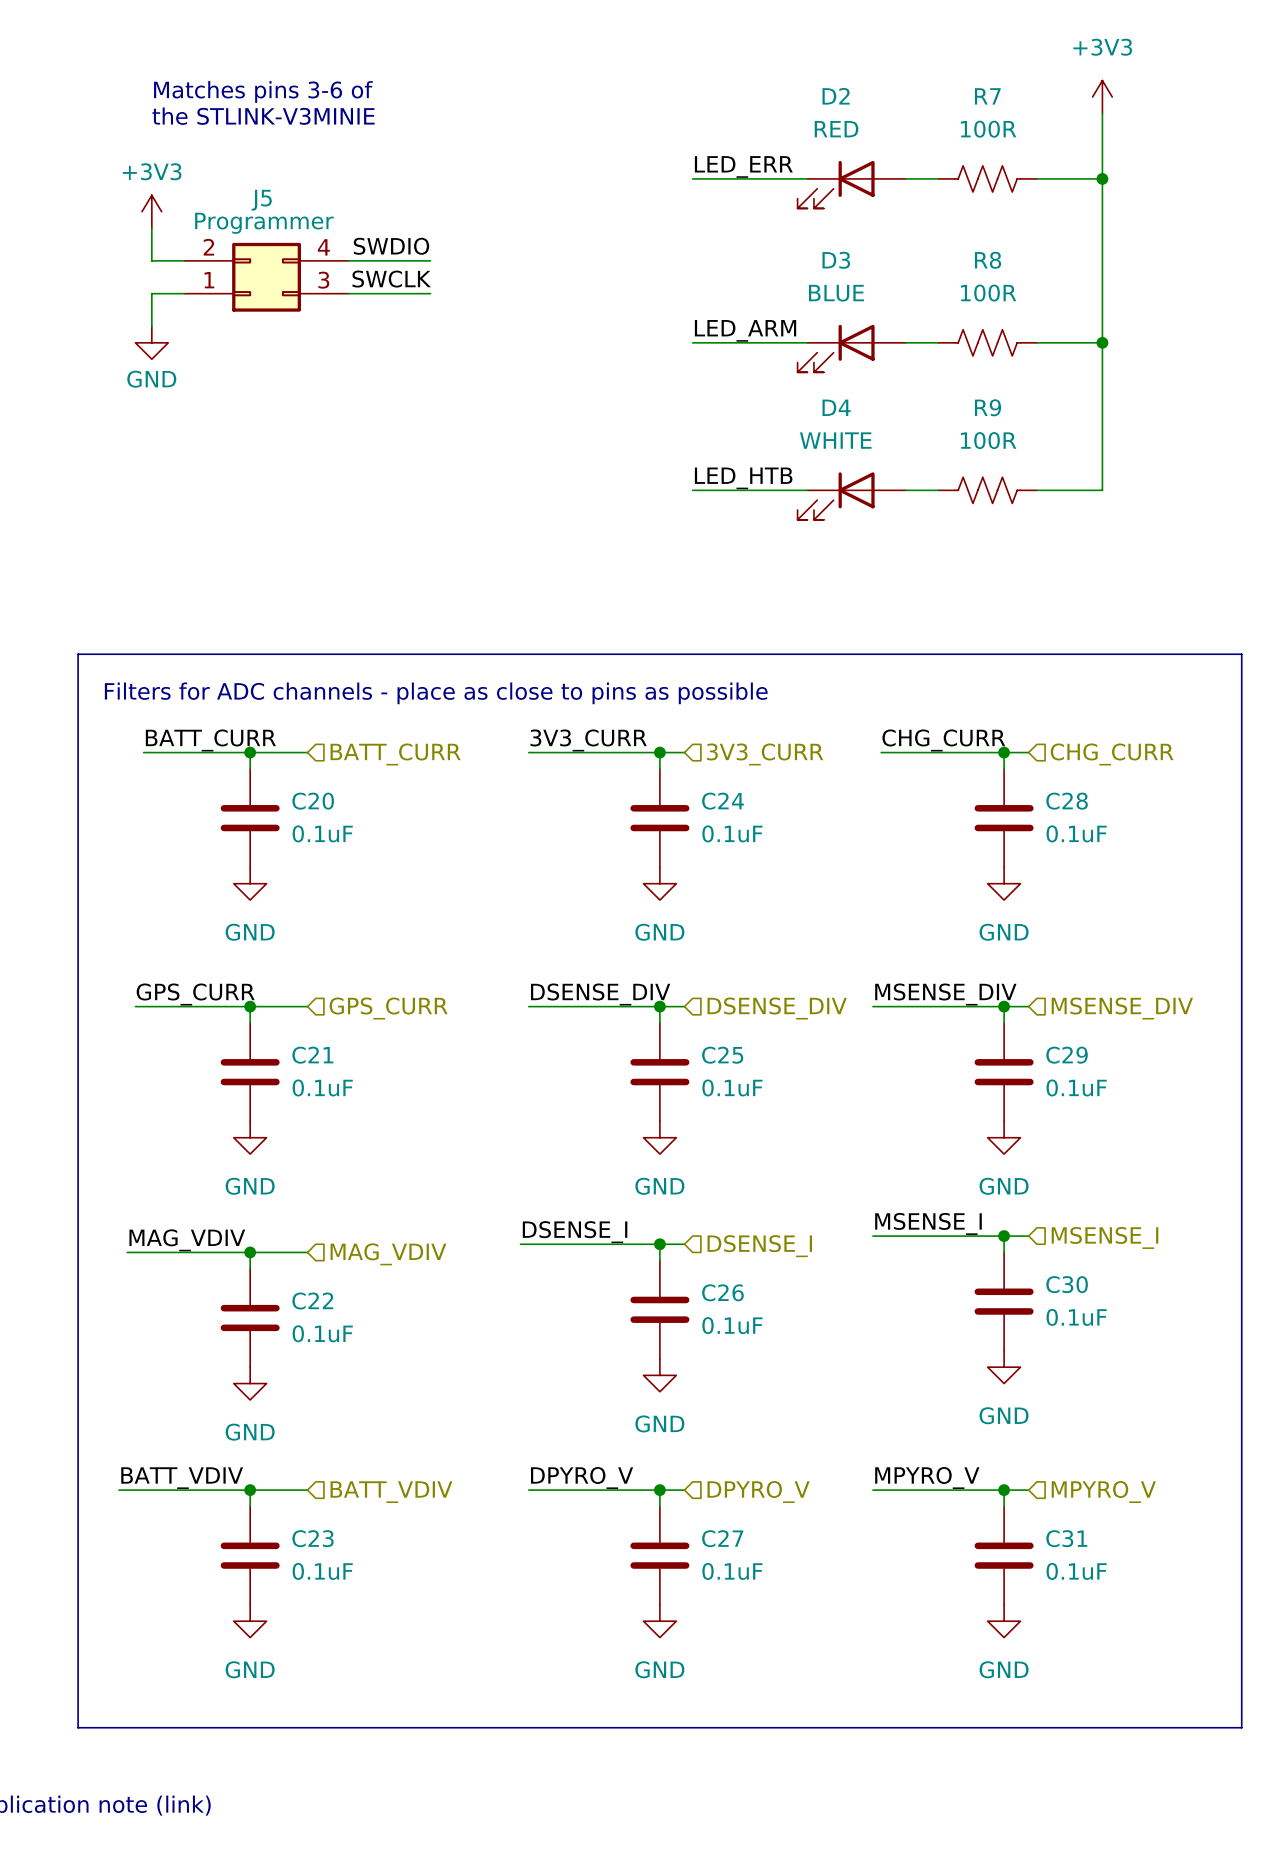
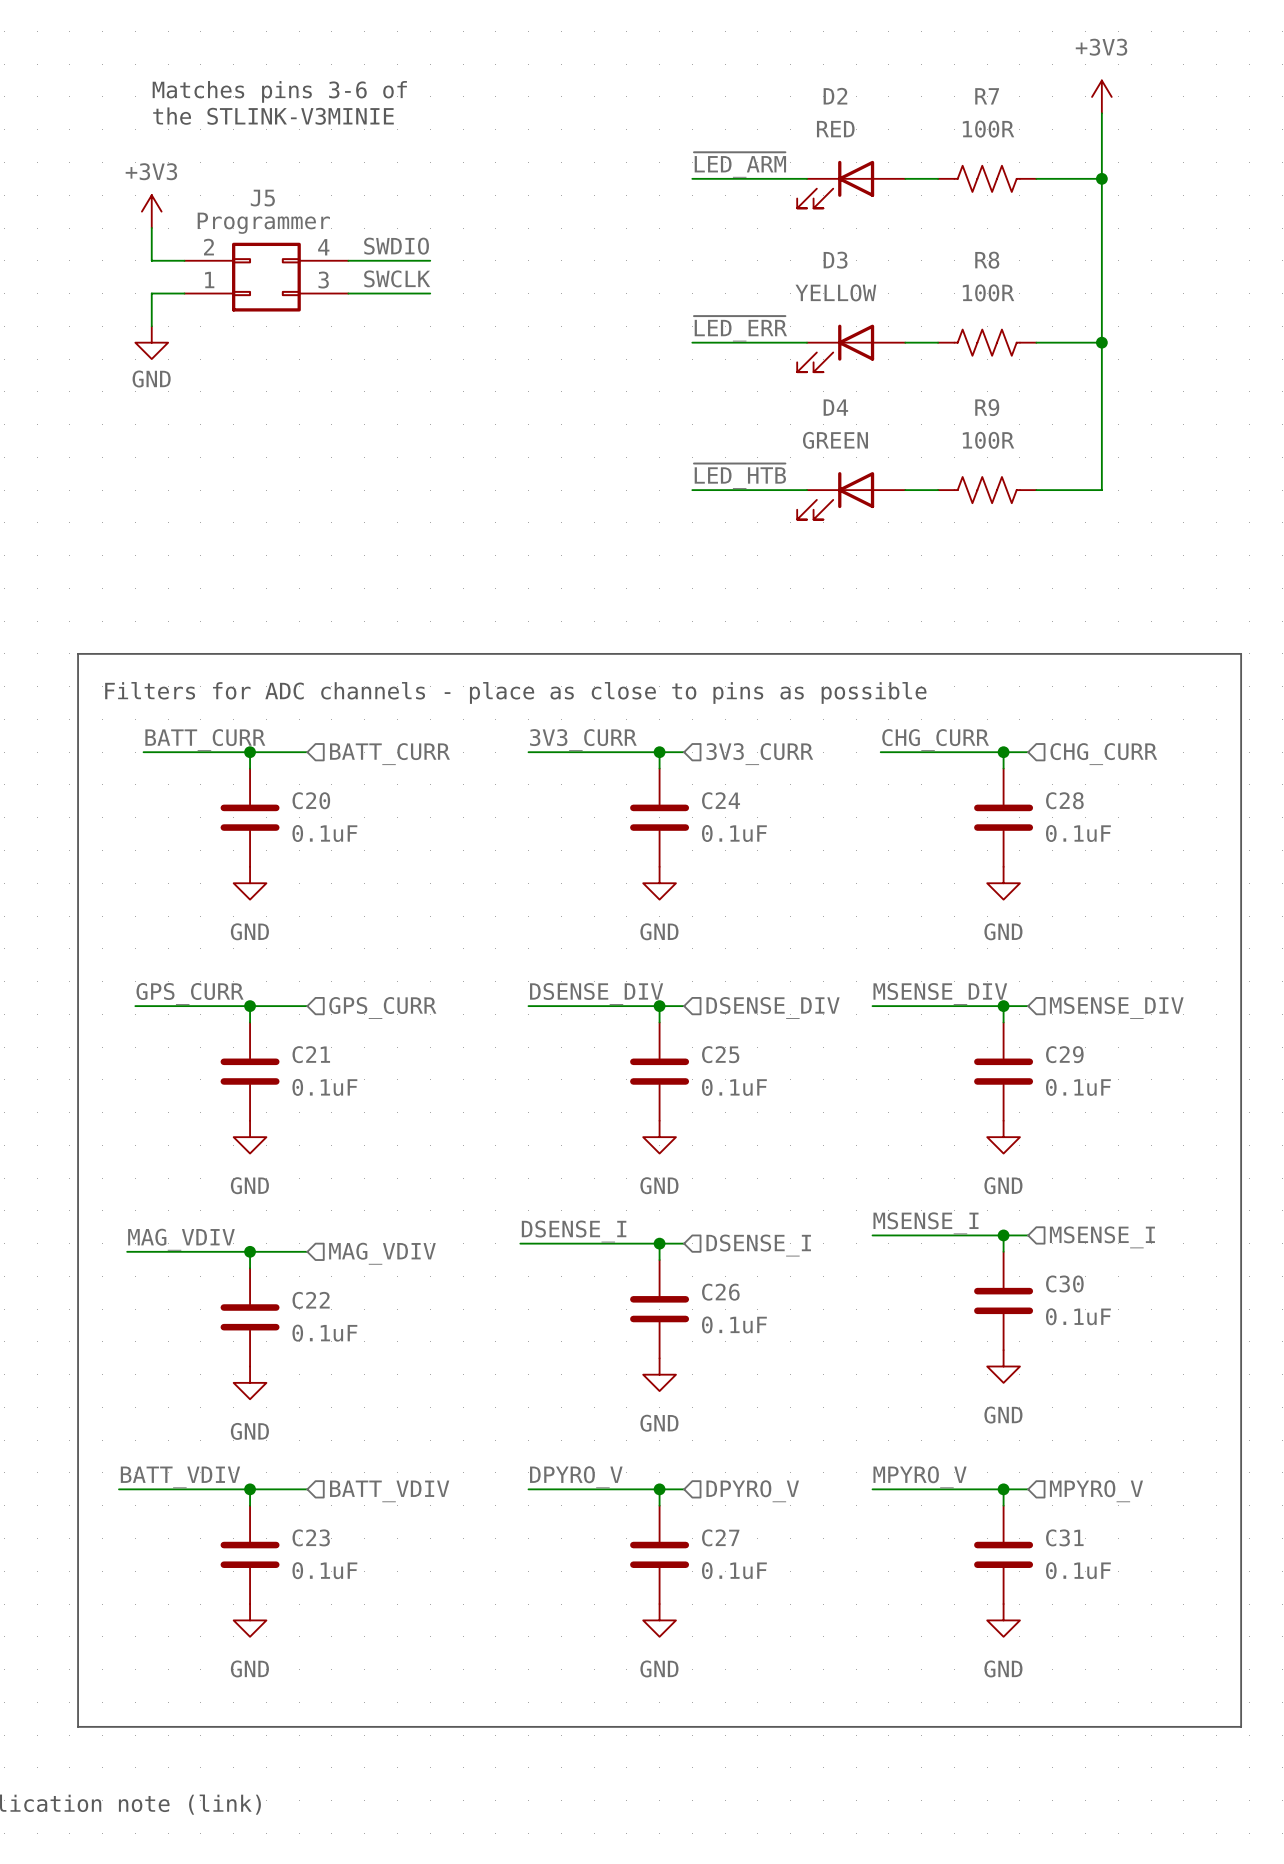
label: LED_ERR (743, 166) -> ~{LED_ARM} (740, 165)
D3 value: BLUE (836, 293) -> YELLOW (835, 292)
label: LED_ARM (745, 330) -> ~{LED_ERR} (740, 328)
D4 value: WHITE (835, 440) -> GREEN (835, 440)
label: LED_HTB (743, 478) -> ~{LED_HTB} (739, 476)

